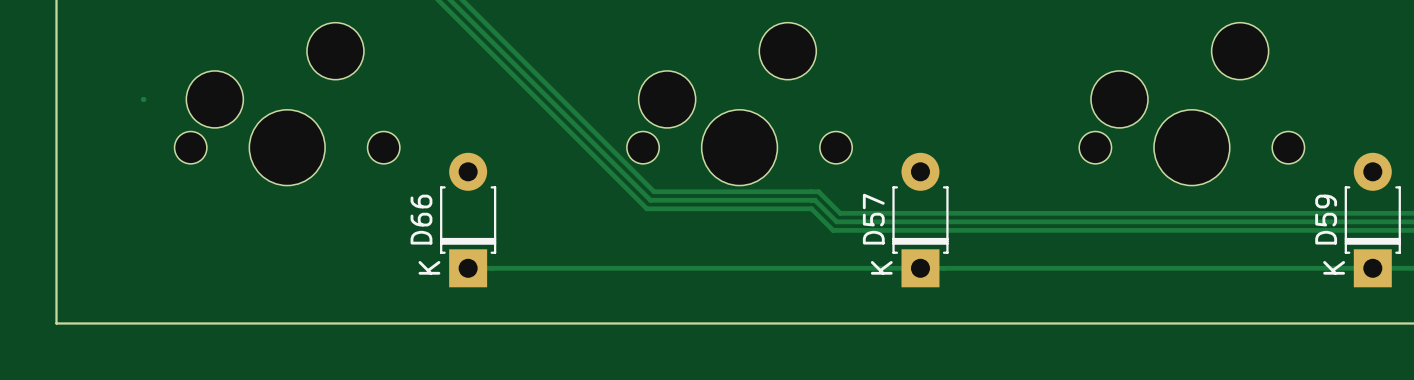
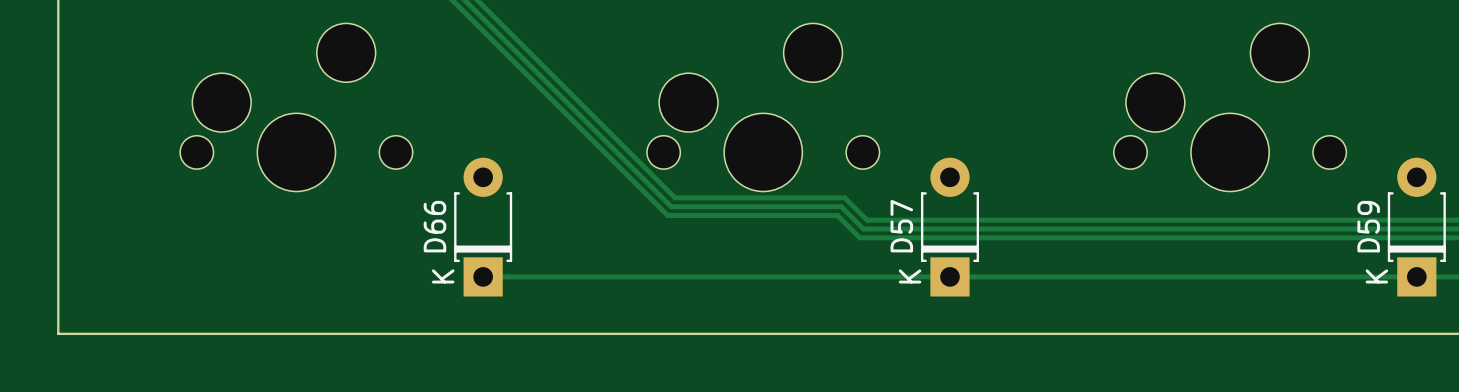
track: (143, 99) (144, 99) -> none

